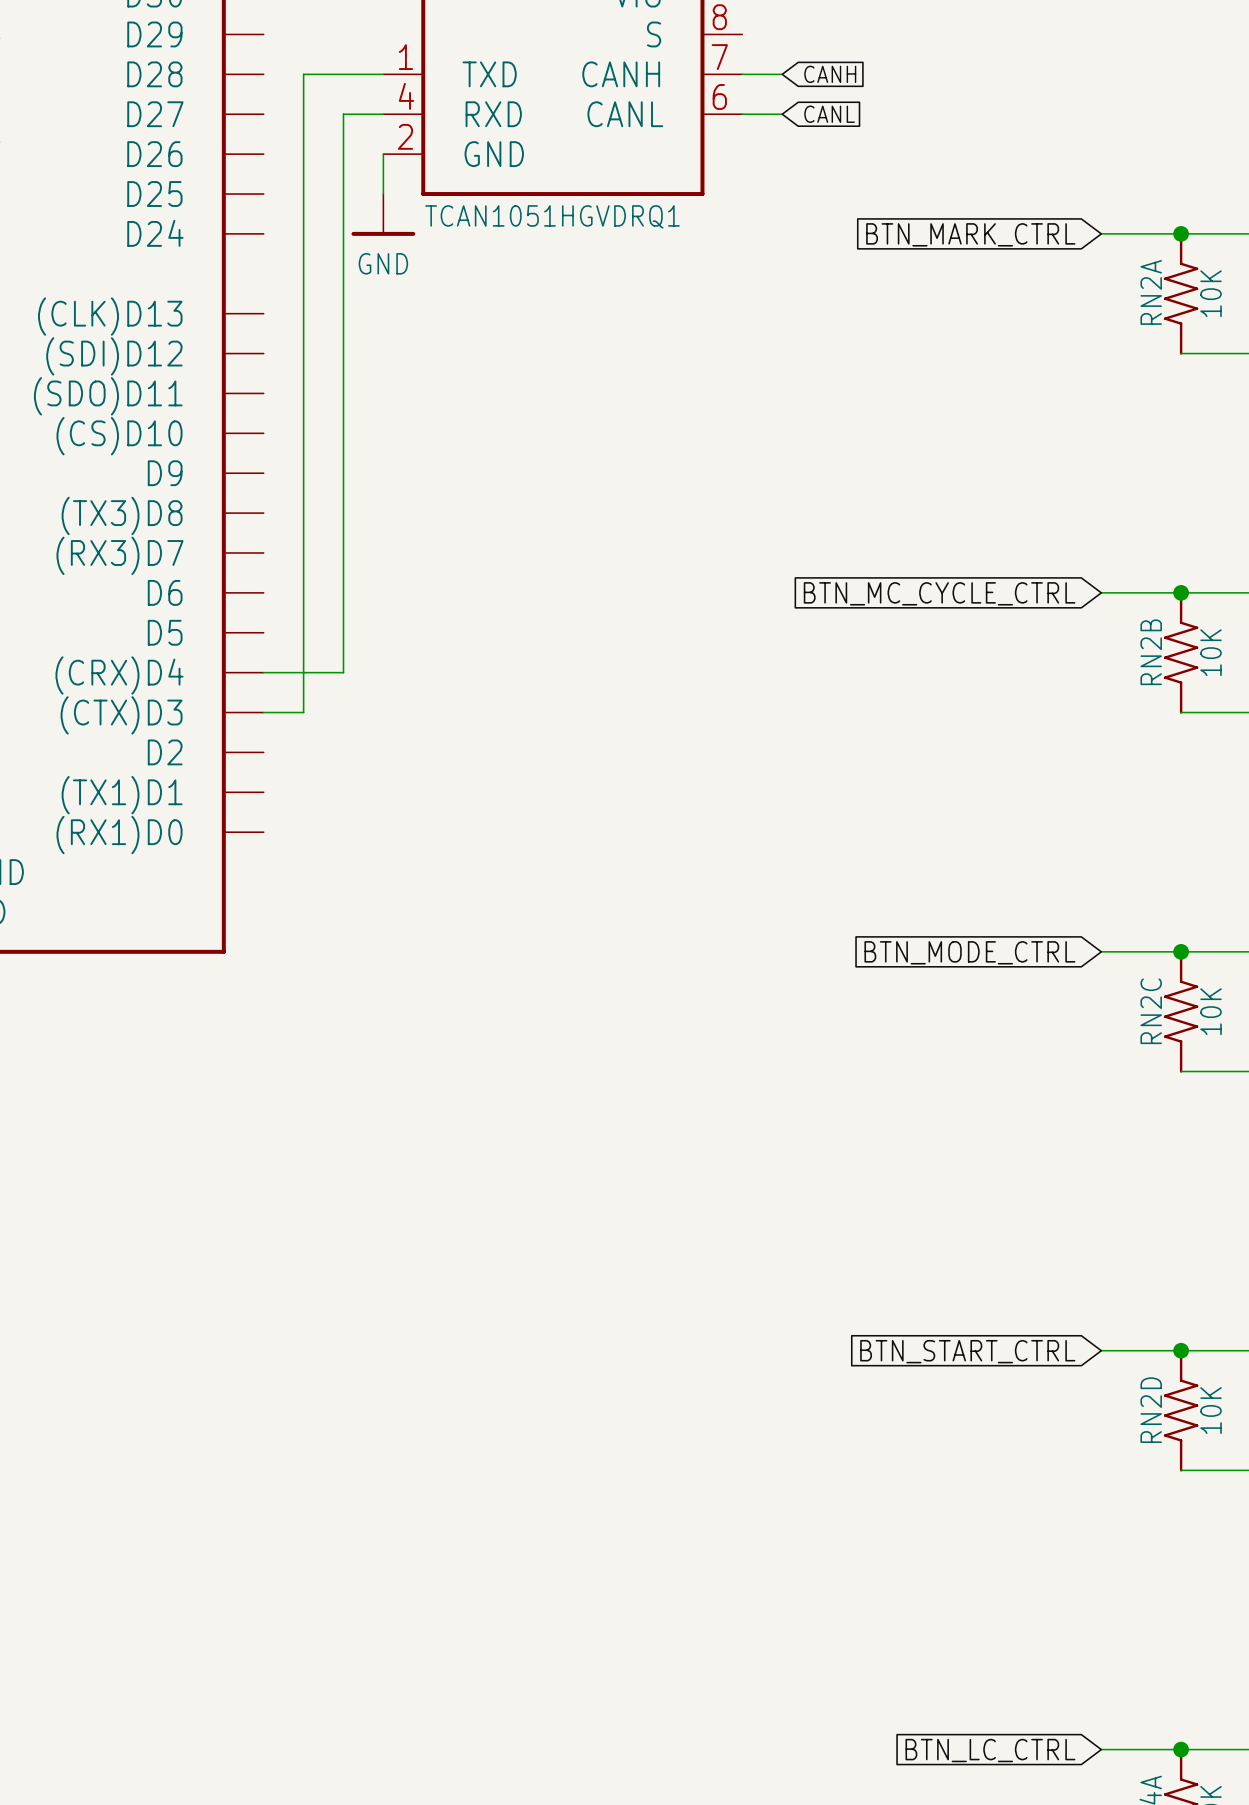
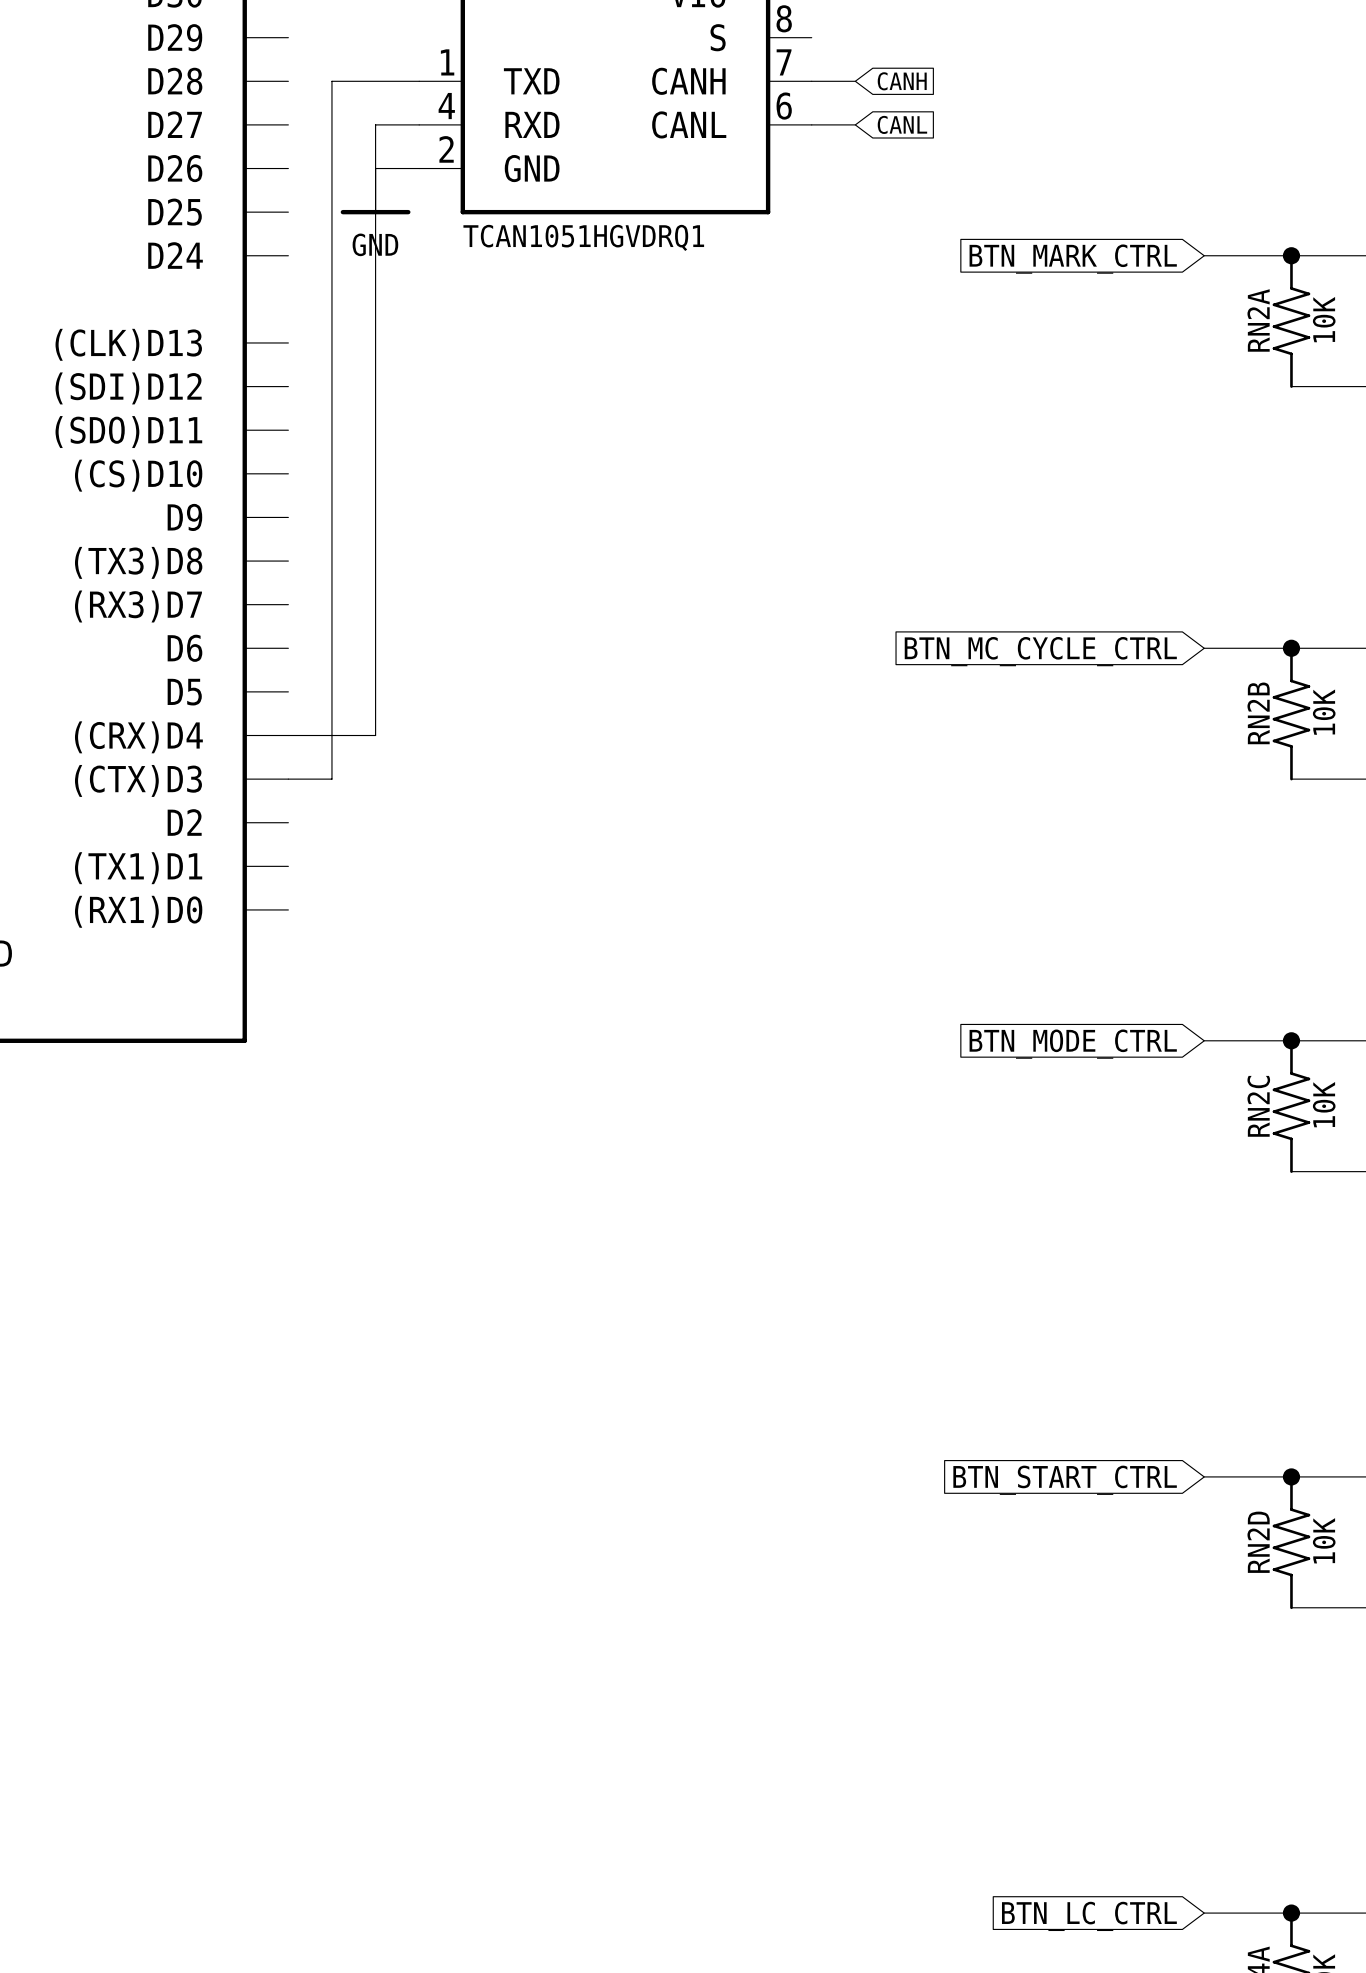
wire: (383, 154) (383, 194) -> (419, 168) (375, 168)
power symbol position: GND (383, 214) -> GND (375, 191)

